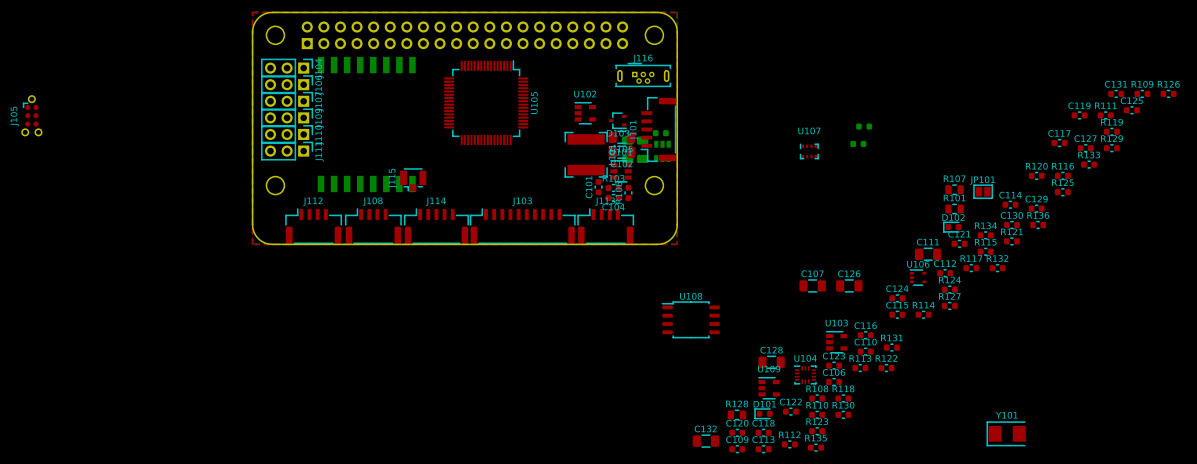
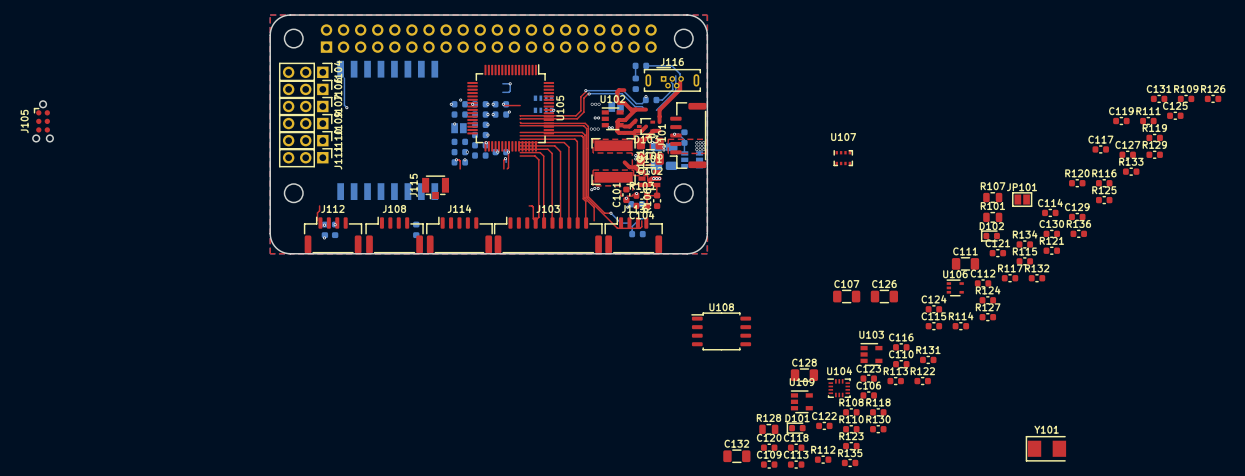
bottom track: none -> (635, 65) (635, 78)
part: none -> (640, 65)
bottom track: none -> (646, 65) (671, 65) (680, 74) (680, 82)
bottom track: none -> (675, 75) (675, 90) (656, 110)
bottom track: none -> (344, 78) (344, 105) (346, 107)
bottom track: none -> (671, 82) (672, 89) (662, 100) (656, 100)
top track: none -> (680, 82) (680, 89) (659, 109) (659, 122)
bottom track: none -> (502, 83) (510, 83) (510, 91) (502, 92)
via: none -> (510, 83)
part: none -> (635, 83)
top track: none -> (585, 90) (580, 96) (580, 110) (575, 115) (520, 115)
bottom track: none -> (585, 90) (623, 90) (636, 103) (642, 103) (646, 99) (646, 96)
via: none -> (585, 90)
top track: none -> (624, 90) (617, 91) (618, 103) (624, 103) (630, 109) (646, 109)
top track: none -> (589, 94) (583, 98) (583, 112) (577, 118) (520, 119)
bottom track: none -> (589, 94) (622, 93) (635, 106) (642, 106) (645, 110)
via: none -> (589, 94)
via: none -> (646, 96)
via: none -> (460, 100)
part: none -> (651, 100)
via: none -> (451, 104)
part: none -> (459, 104)
via: none -> (472, 104)
part: none -> (480, 104)
via: none -> (488, 104)
via: none -> (493, 104)
part: none -> (500, 104)
top track: none -> (503, 104) (520, 105)
via: none -> (503, 104)
part: none -> (543, 104)
via: none -> (592, 104)
via: none -> (595, 104)
via: none -> (599, 104)
part: none -> (616, 106)
via: none -> (346, 107)
via: none -> (553, 110)
top track: none -> (635, 109) (625, 120) (617, 121) (617, 131) (633, 132) (641, 130) (646, 126)
via: none -> (509, 111)
part: none -> (459, 114)
part: none -> (480, 114)
via: none -> (488, 114)
via: none -> (493, 114)
part: none -> (500, 114)
via: none -> (595, 117)
via: none -> (598, 117)
top track: none -> (520, 122) (585, 123) (588, 126) (588, 196) (604, 213) (610, 213)
top track: none -> (635, 123) (635, 120) (629, 126) (624, 126)
via: none -> (454, 123)
part: none -> (480, 124)
via: none -> (488, 124)
top track: none -> (520, 125) (583, 125) (586, 128) (586, 197) (617, 228) (640, 228) (641, 220)
via: none -> (609, 127)
via: none -> (612, 127)
part: none -> (458, 128)
via: none -> (591, 129)
via: none -> (594, 129)
via: none -> (598, 129)
top track: none -> (659, 130) (653, 130) (640, 143)
top track: none -> (520, 132) (582, 132) (584, 135) (584, 198) (594, 207) (594, 220)
part: (864, 126) -> none
top zone outline: none -> (634, 134) (634, 139) (593, 139) (593, 152) (632, 152) (632, 165) (650, 165) (650, 134) (634, 134)
bottom track: none -> (674, 134) (678, 134) (684, 139) (684, 153)
via: none -> (674, 134)
part: none -> (480, 135)
via: none -> (488, 135)
top track: none -> (520, 135) (583, 137) (583, 198) (585, 201) (585, 220)
top track: none -> (520, 139) (574, 139) (577, 141) (577, 220)
top zone outline: none -> (668, 139) (707, 139) (707, 153) (668, 153) (668, 139)
part rotation: 0° (660, 133) -> 90° clockwise (684, 137)
part: none -> (459, 141)
via: none -> (486, 142)
top track: none -> (520, 142) (564, 142) (568, 147) (568, 220)
via: none -> (652, 142)
via: none -> (696, 142)
via: none -> (700, 142)
via: none -> (703, 142)
part: none -> (480, 145)
top track: none -> (520, 145) (554, 145) (560, 151) (560, 220)
via: none -> (696, 146)
via: none -> (700, 146)
via: none -> (703, 146)
via: none -> (663, 147)
top track: none -> (520, 149) (547, 149) (552, 153) (552, 220)
via: none -> (663, 149)
via: none -> (696, 149)
via: none -> (700, 149)
via: none -> (703, 149)
part: (858, 143) -> none
part: none -> (459, 152)
via: none -> (467, 152)
via: none -> (497, 152)
part: none -> (500, 152)
top track: none -> (508, 152) (507, 168)
via: none -> (508, 152)
top track: none -> (520, 152) (540, 152) (543, 156) (543, 220)
part: none -> (480, 155)
via: none -> (635, 155)
top track: none -> (520, 155) (535, 155) (538, 159) (538, 217) (535, 220) (533, 218) (533, 207) (529, 205)
top track: none -> (505, 158) (503, 168)
bottom track: none -> (505, 158) (506, 162)
via: none -> (505, 158)
part rotation: 0° (662, 151) -> 90° clockwise (692, 159)
via: none -> (635, 158)
top track: none -> (456, 159) (460, 161) (460, 168)
via: none -> (456, 159)
via: none -> (464, 159)
part: none -> (459, 162)
top track: none -> (624, 162) (629, 167) (635, 167) (642, 172) (638, 172)
top zone outline: none -> (593, 170) (593, 185) (620, 185) (620, 196) (632, 196) (632, 184) (647, 184) (647, 175) (633, 175) (633, 170) (593, 170)
via: none -> (648, 172)
via: none -> (653, 178)
via: none -> (656, 178)
top track: none -> (659, 178) (651, 178) (649, 184) (642, 184)
via: none -> (659, 178)
top track: none -> (656, 184) (657, 195) (647, 195) (647, 205)
via: none -> (594, 188)
via: none -> (598, 188)
via: none -> (591, 189)
via: none -> (636, 193)
via: none -> (626, 198)
part: none -> (636, 204)
top track: none -> (319, 205) (317, 220)
via: none -> (627, 207)
bottom track: none -> (610, 213) (620, 223) (630, 223)
via: none -> (610, 213)
bottom track: none -> (643, 218) (639, 218) (632, 226) (632, 234)
via: none -> (324, 225)
via: none -> (335, 224)
part: none -> (324, 229)
part: none -> (335, 229)
part: none -> (416, 229)
part: none -> (637, 234)
via: none -> (324, 237)

